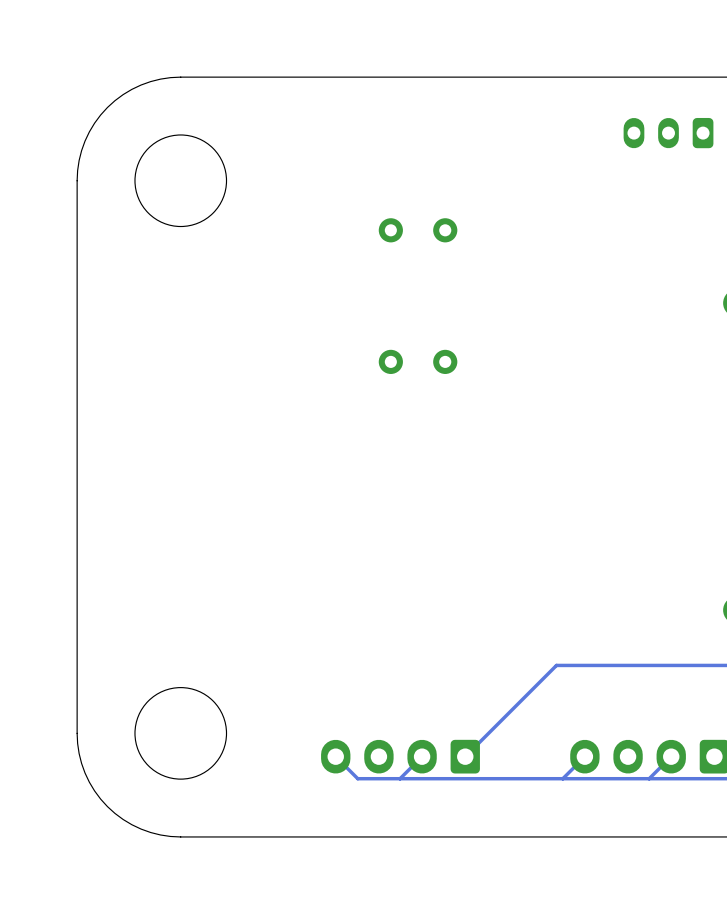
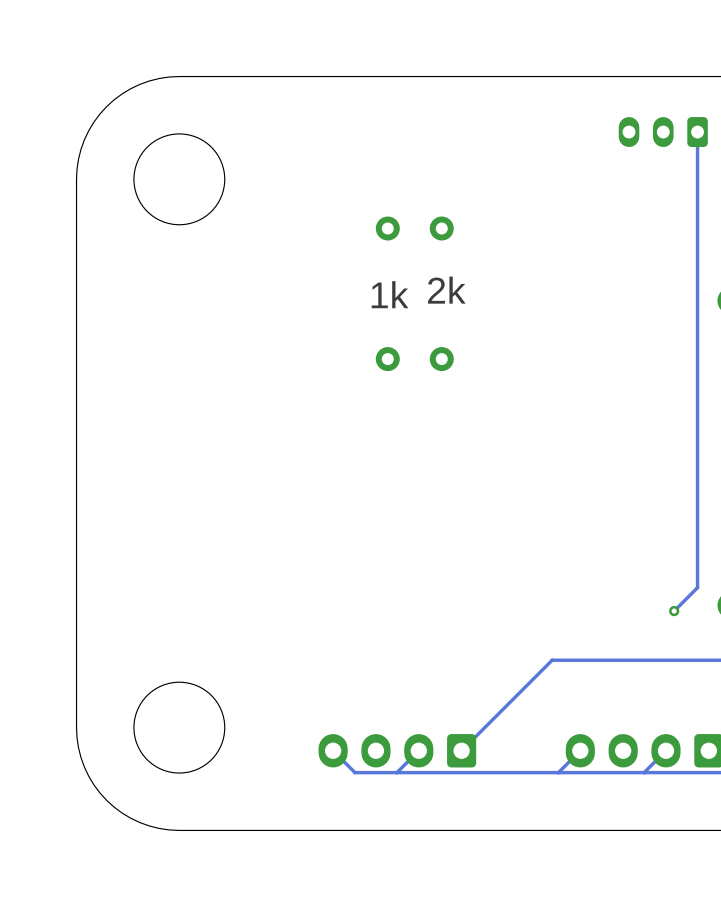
track: none -> (697, 132) (697, 587) (674, 611)
text: none -> 2k (446, 290)
text: none -> 1k (390, 294)
via: none -> (674, 611)

